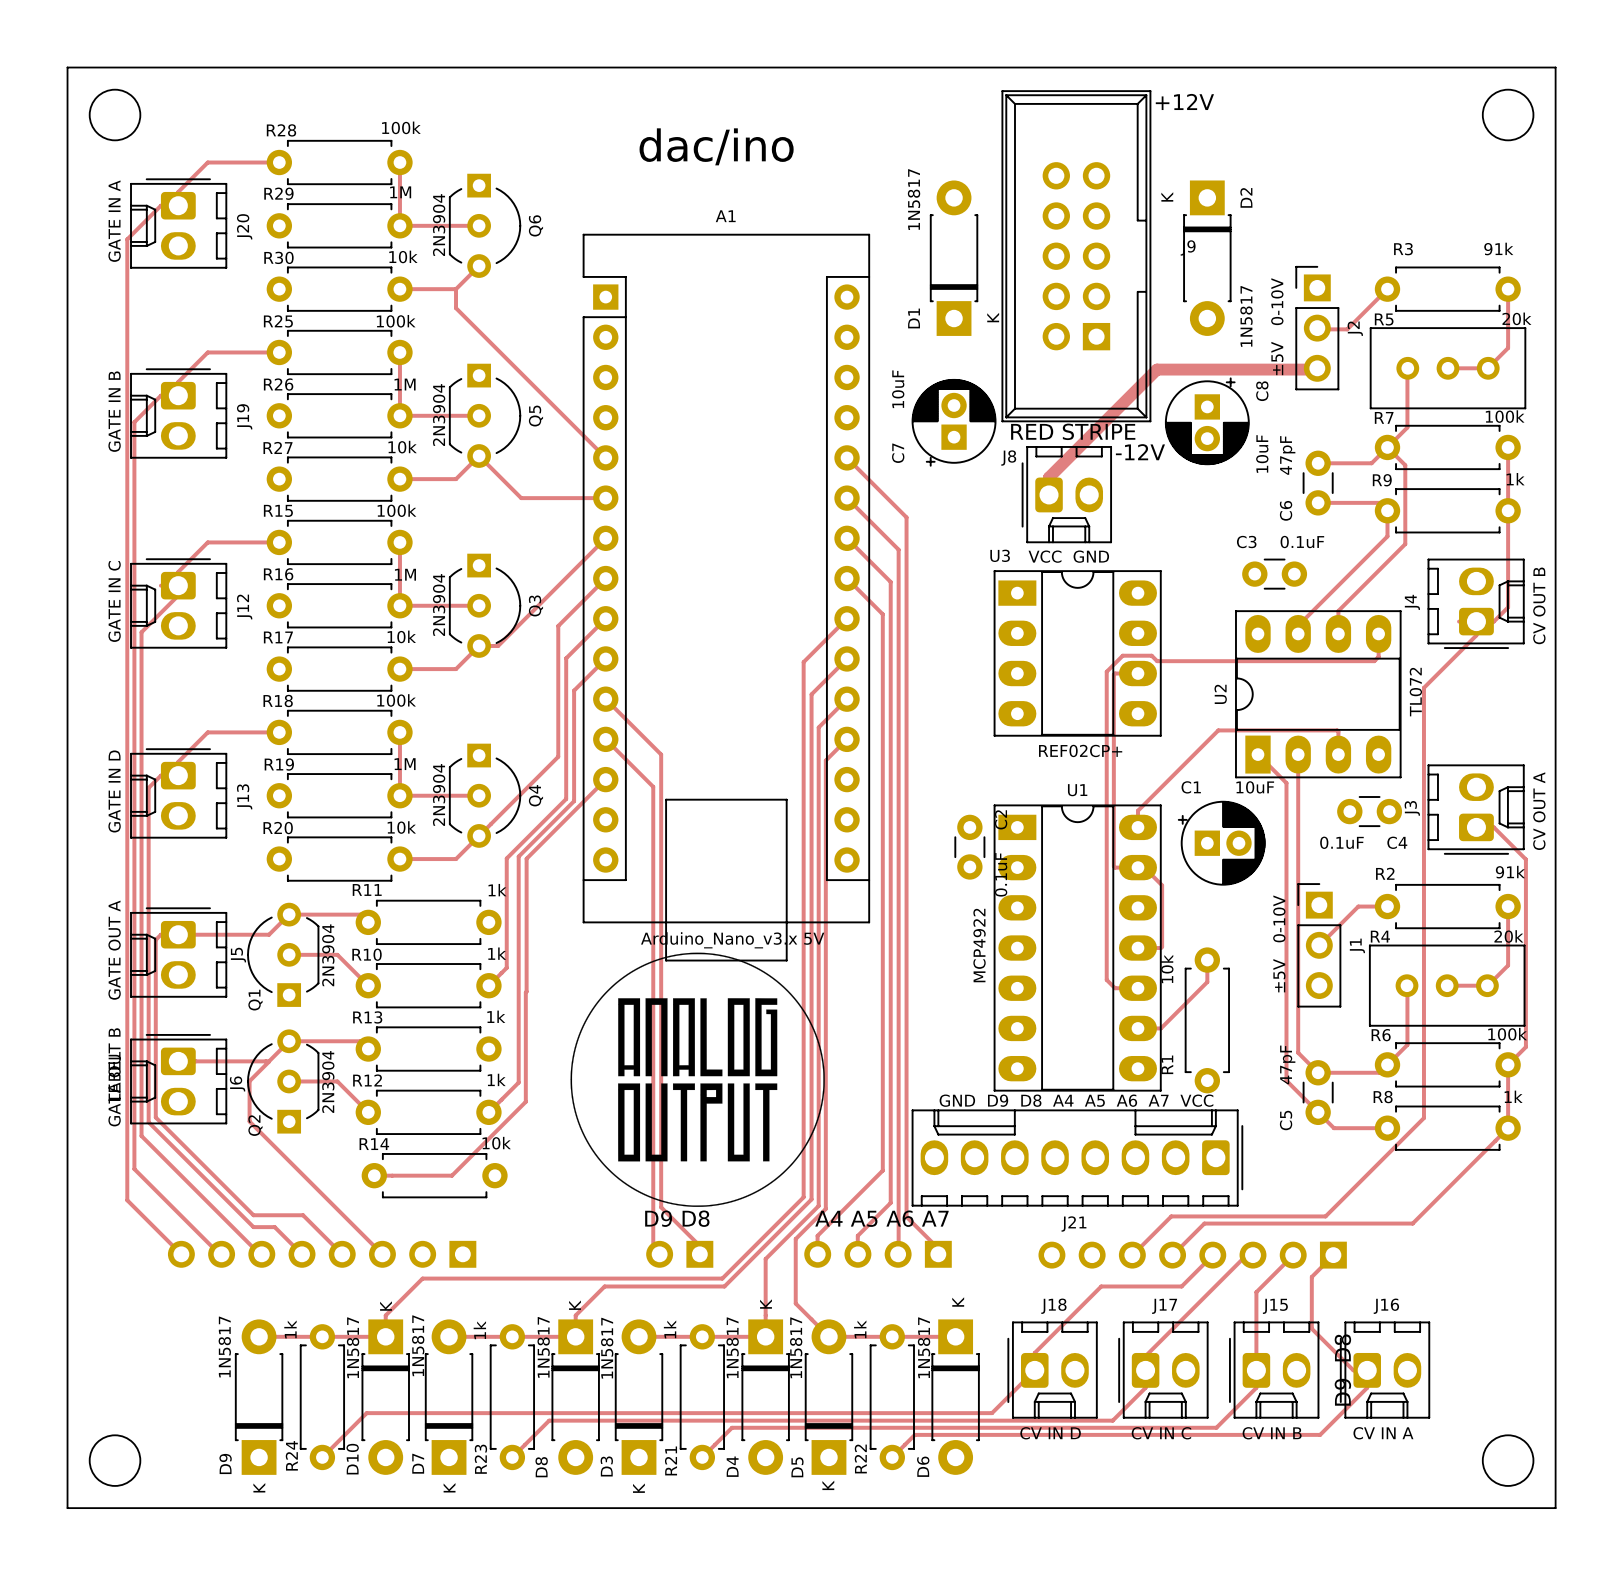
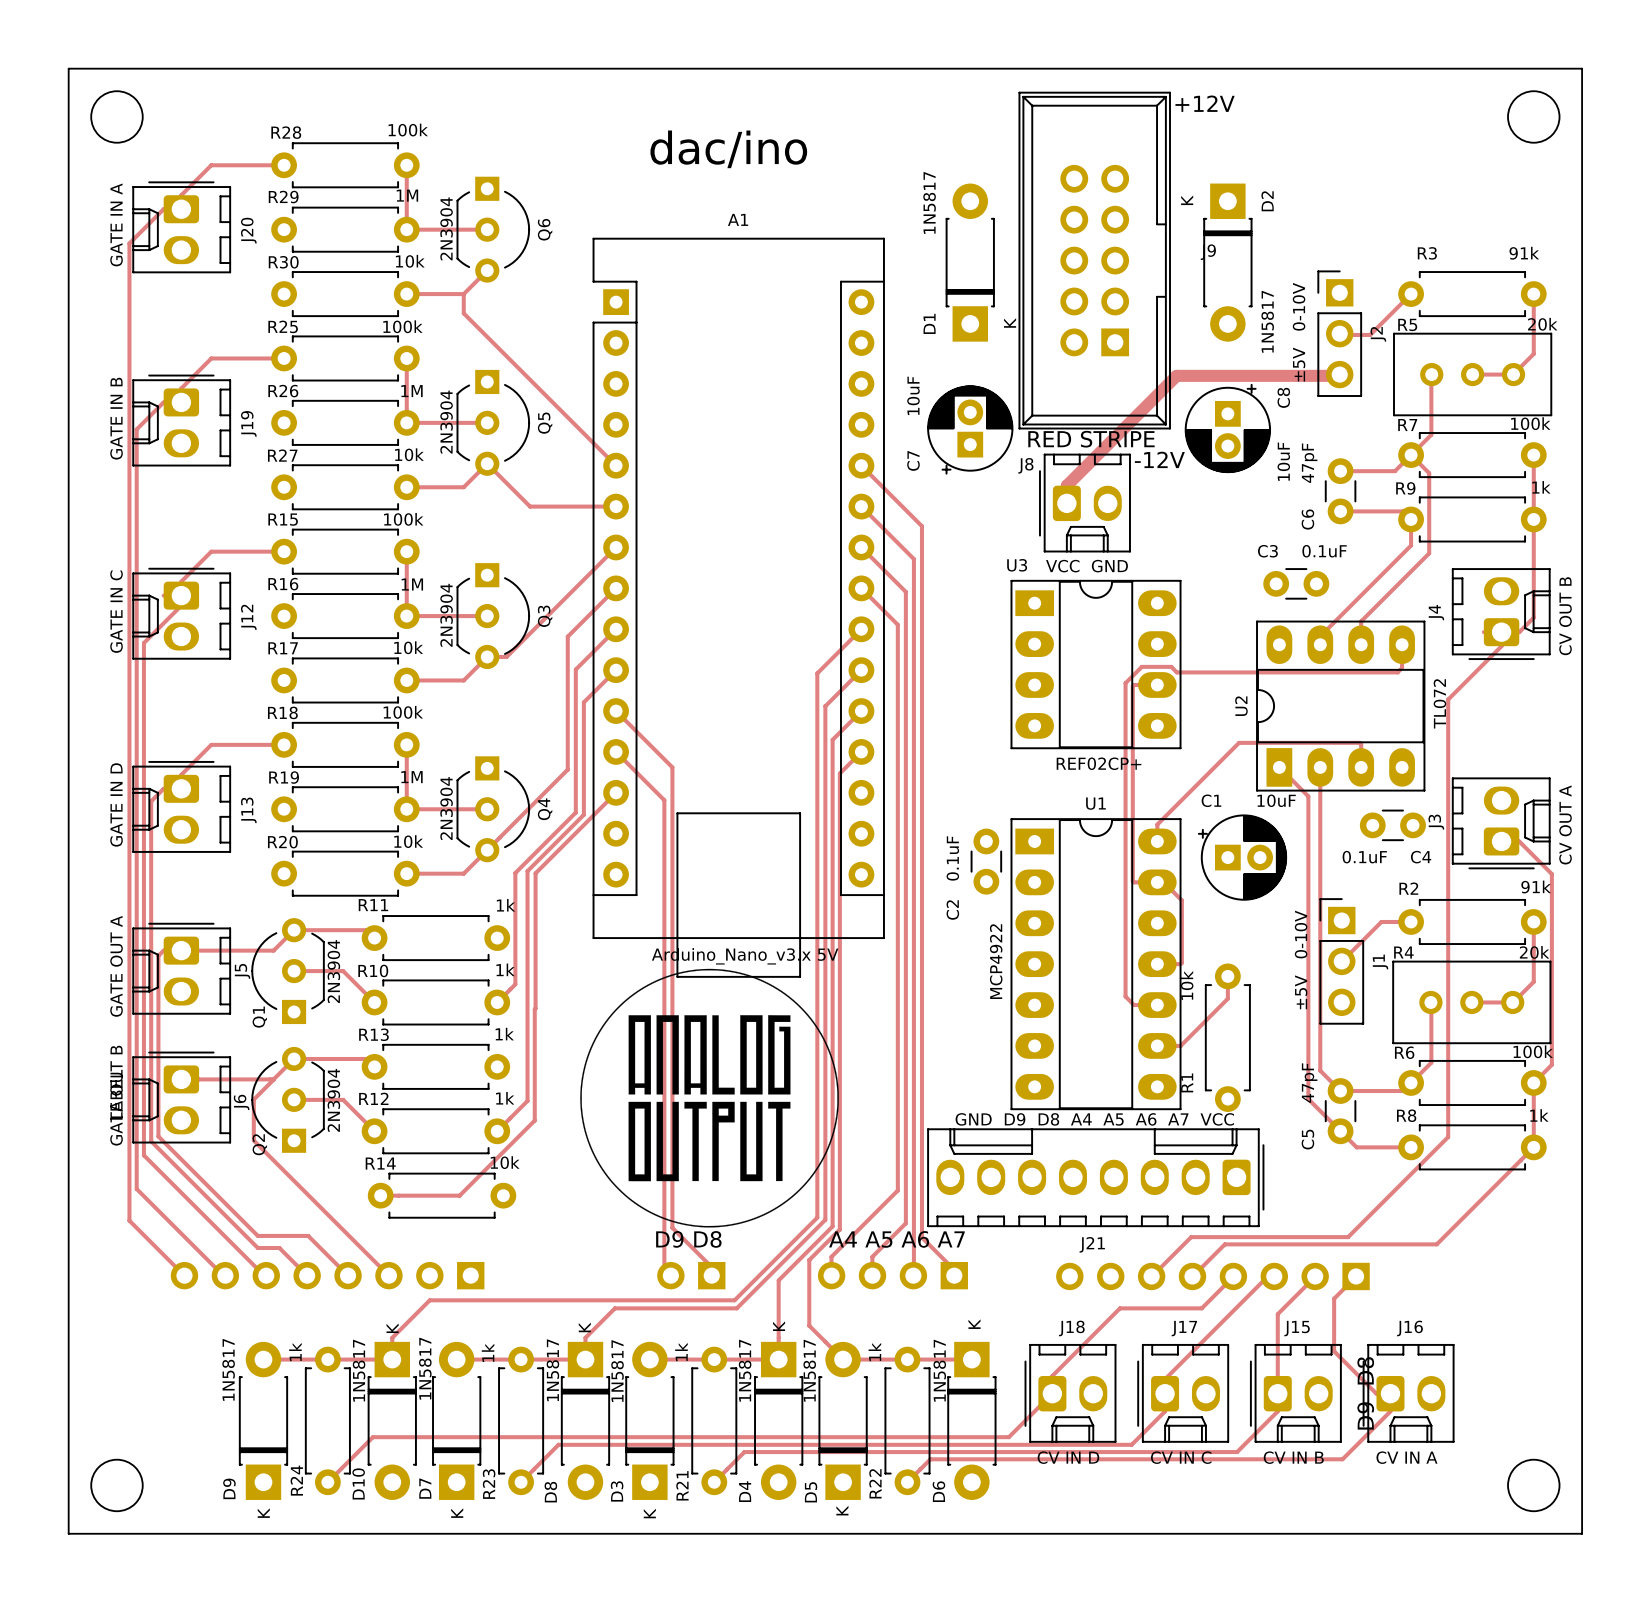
C2 name position: C2 (1001, 819) -> C2 (952, 910)
C2 value position: 0.1uF (1001, 874) -> 0.1uF (952, 858)

